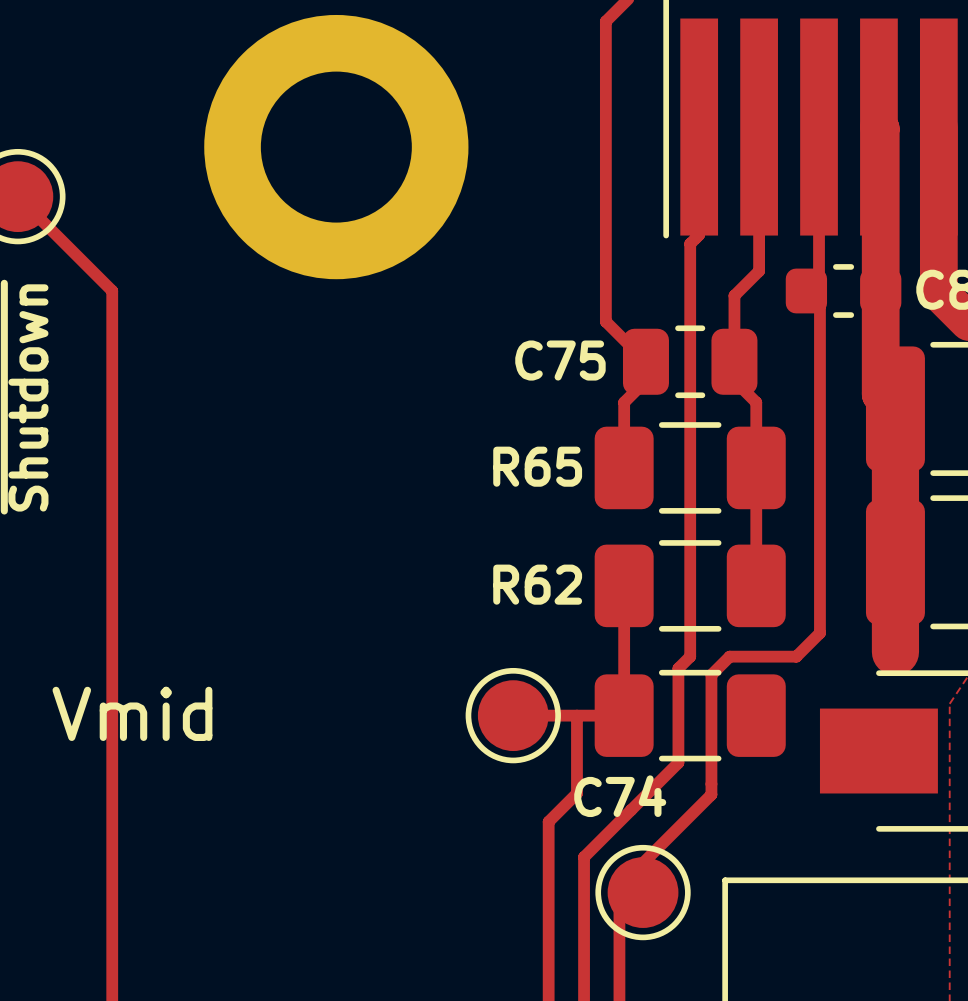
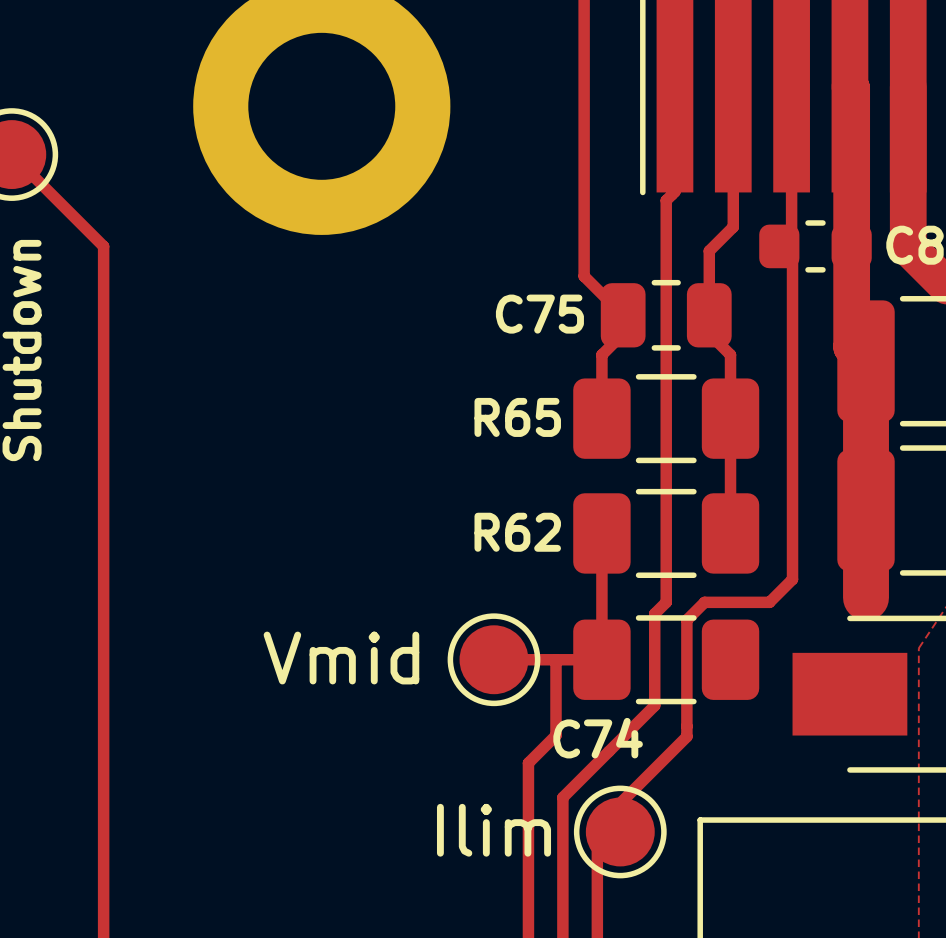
text position: Vmid (132, 713) -> Vmid (341, 658)
text: none -> Ilim (494, 830)

